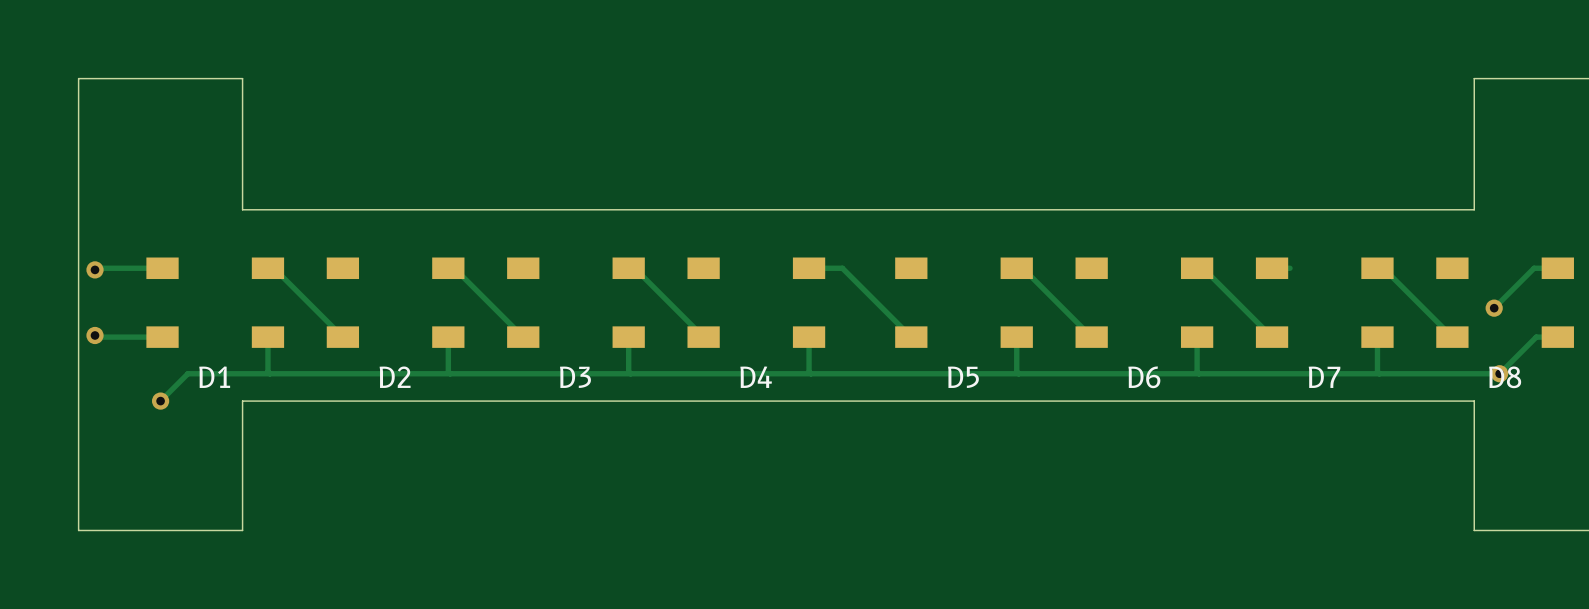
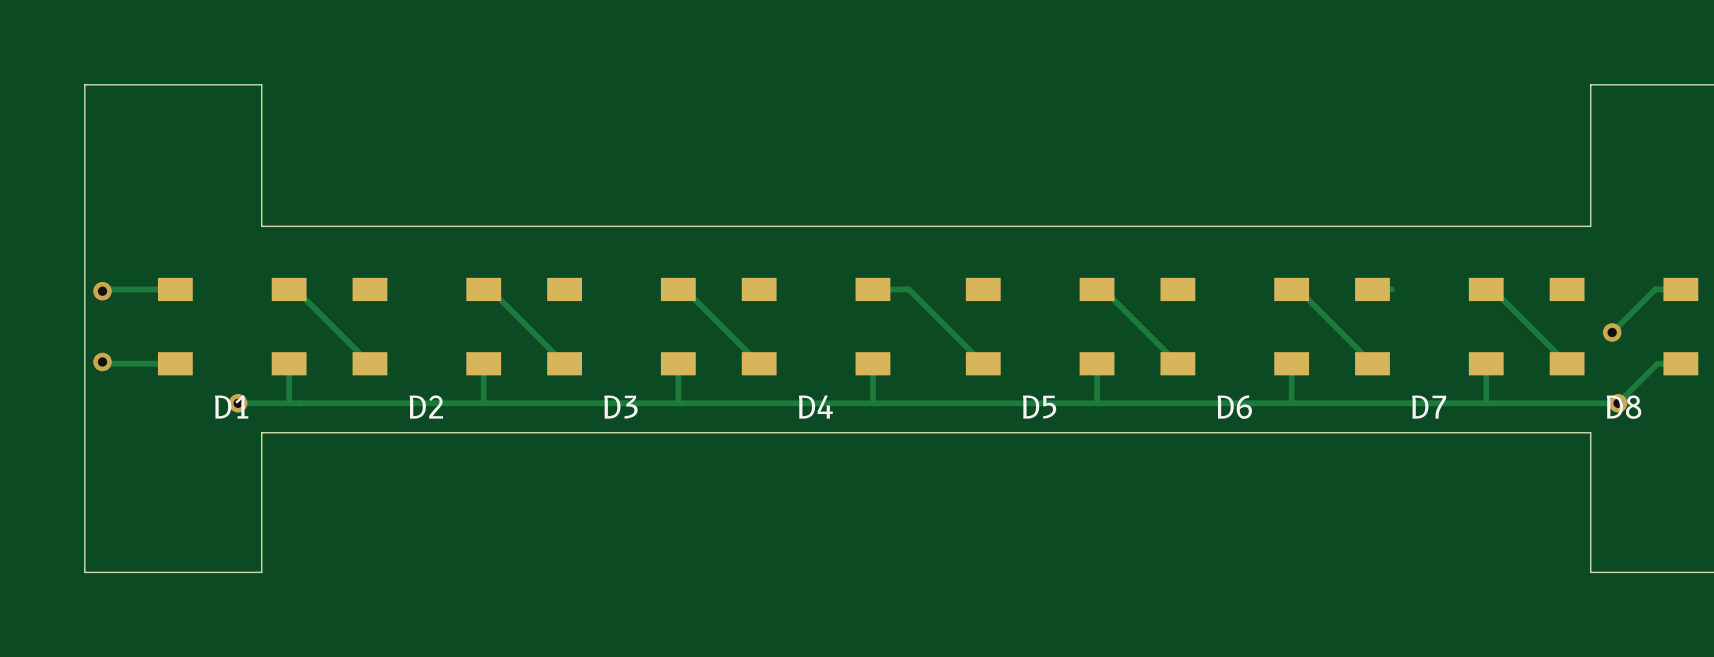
track: (220, 373) (187, 373) (160, 401) -> none
via position: (160, 401) -> (238, 403)

